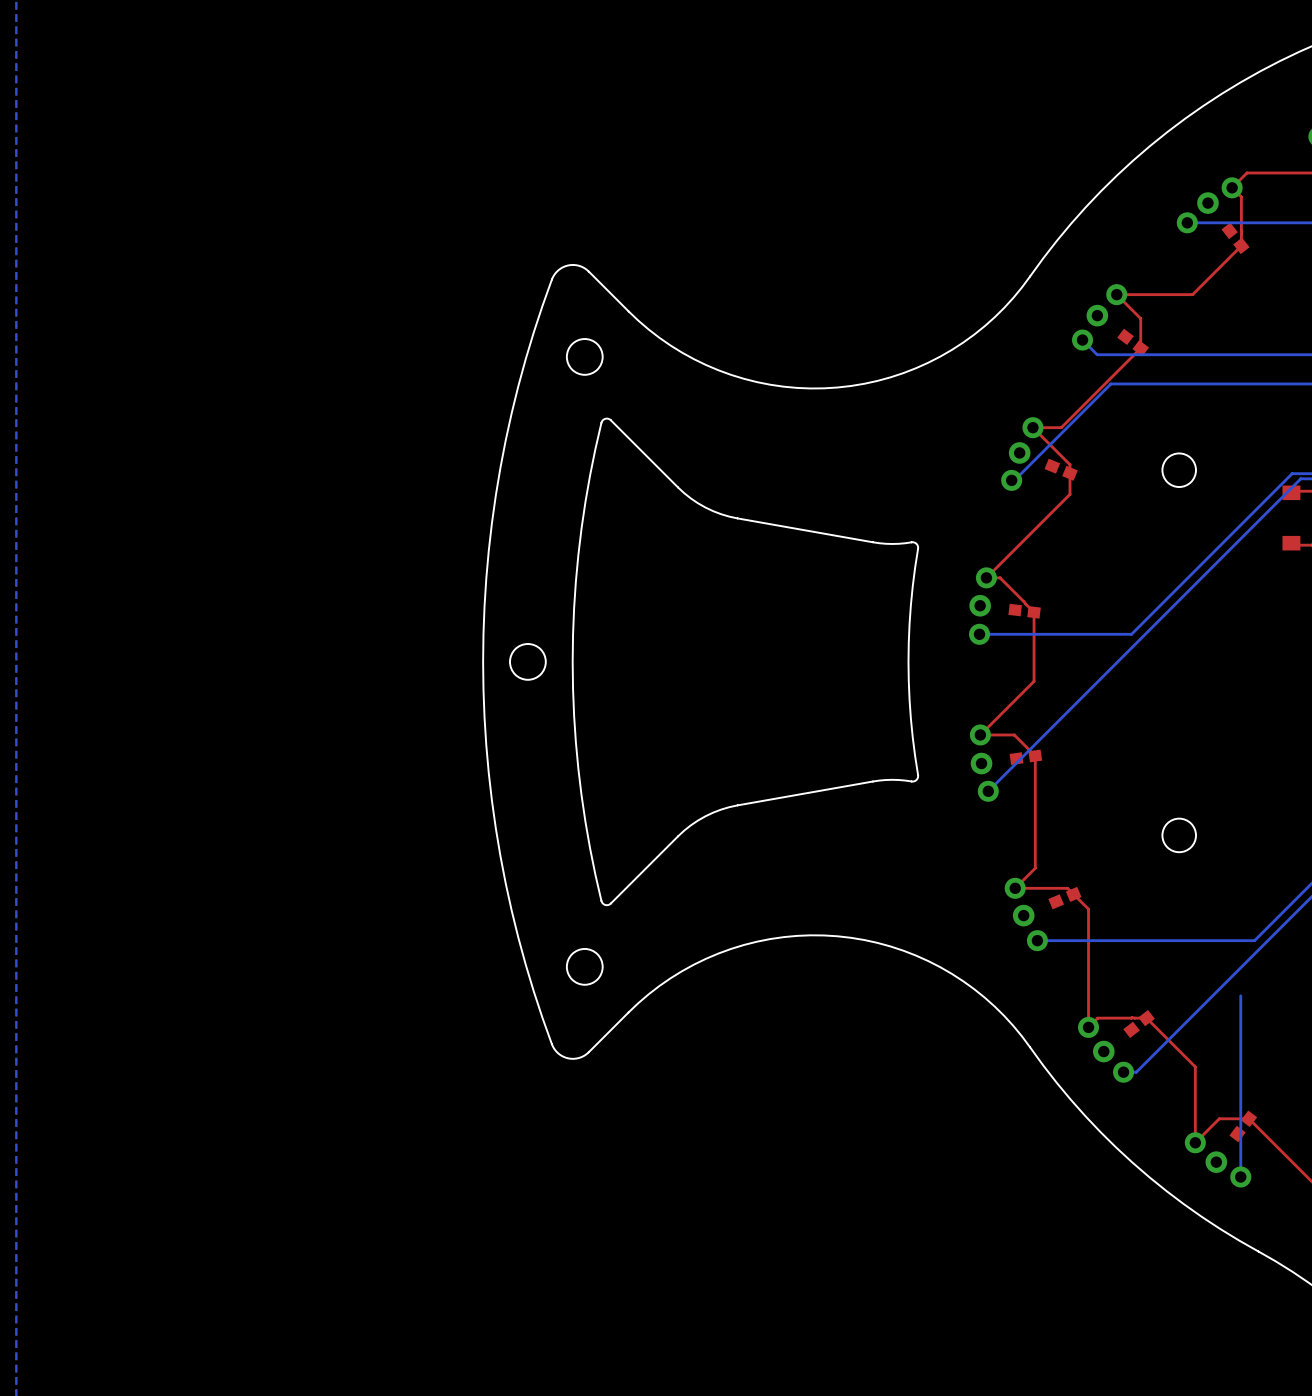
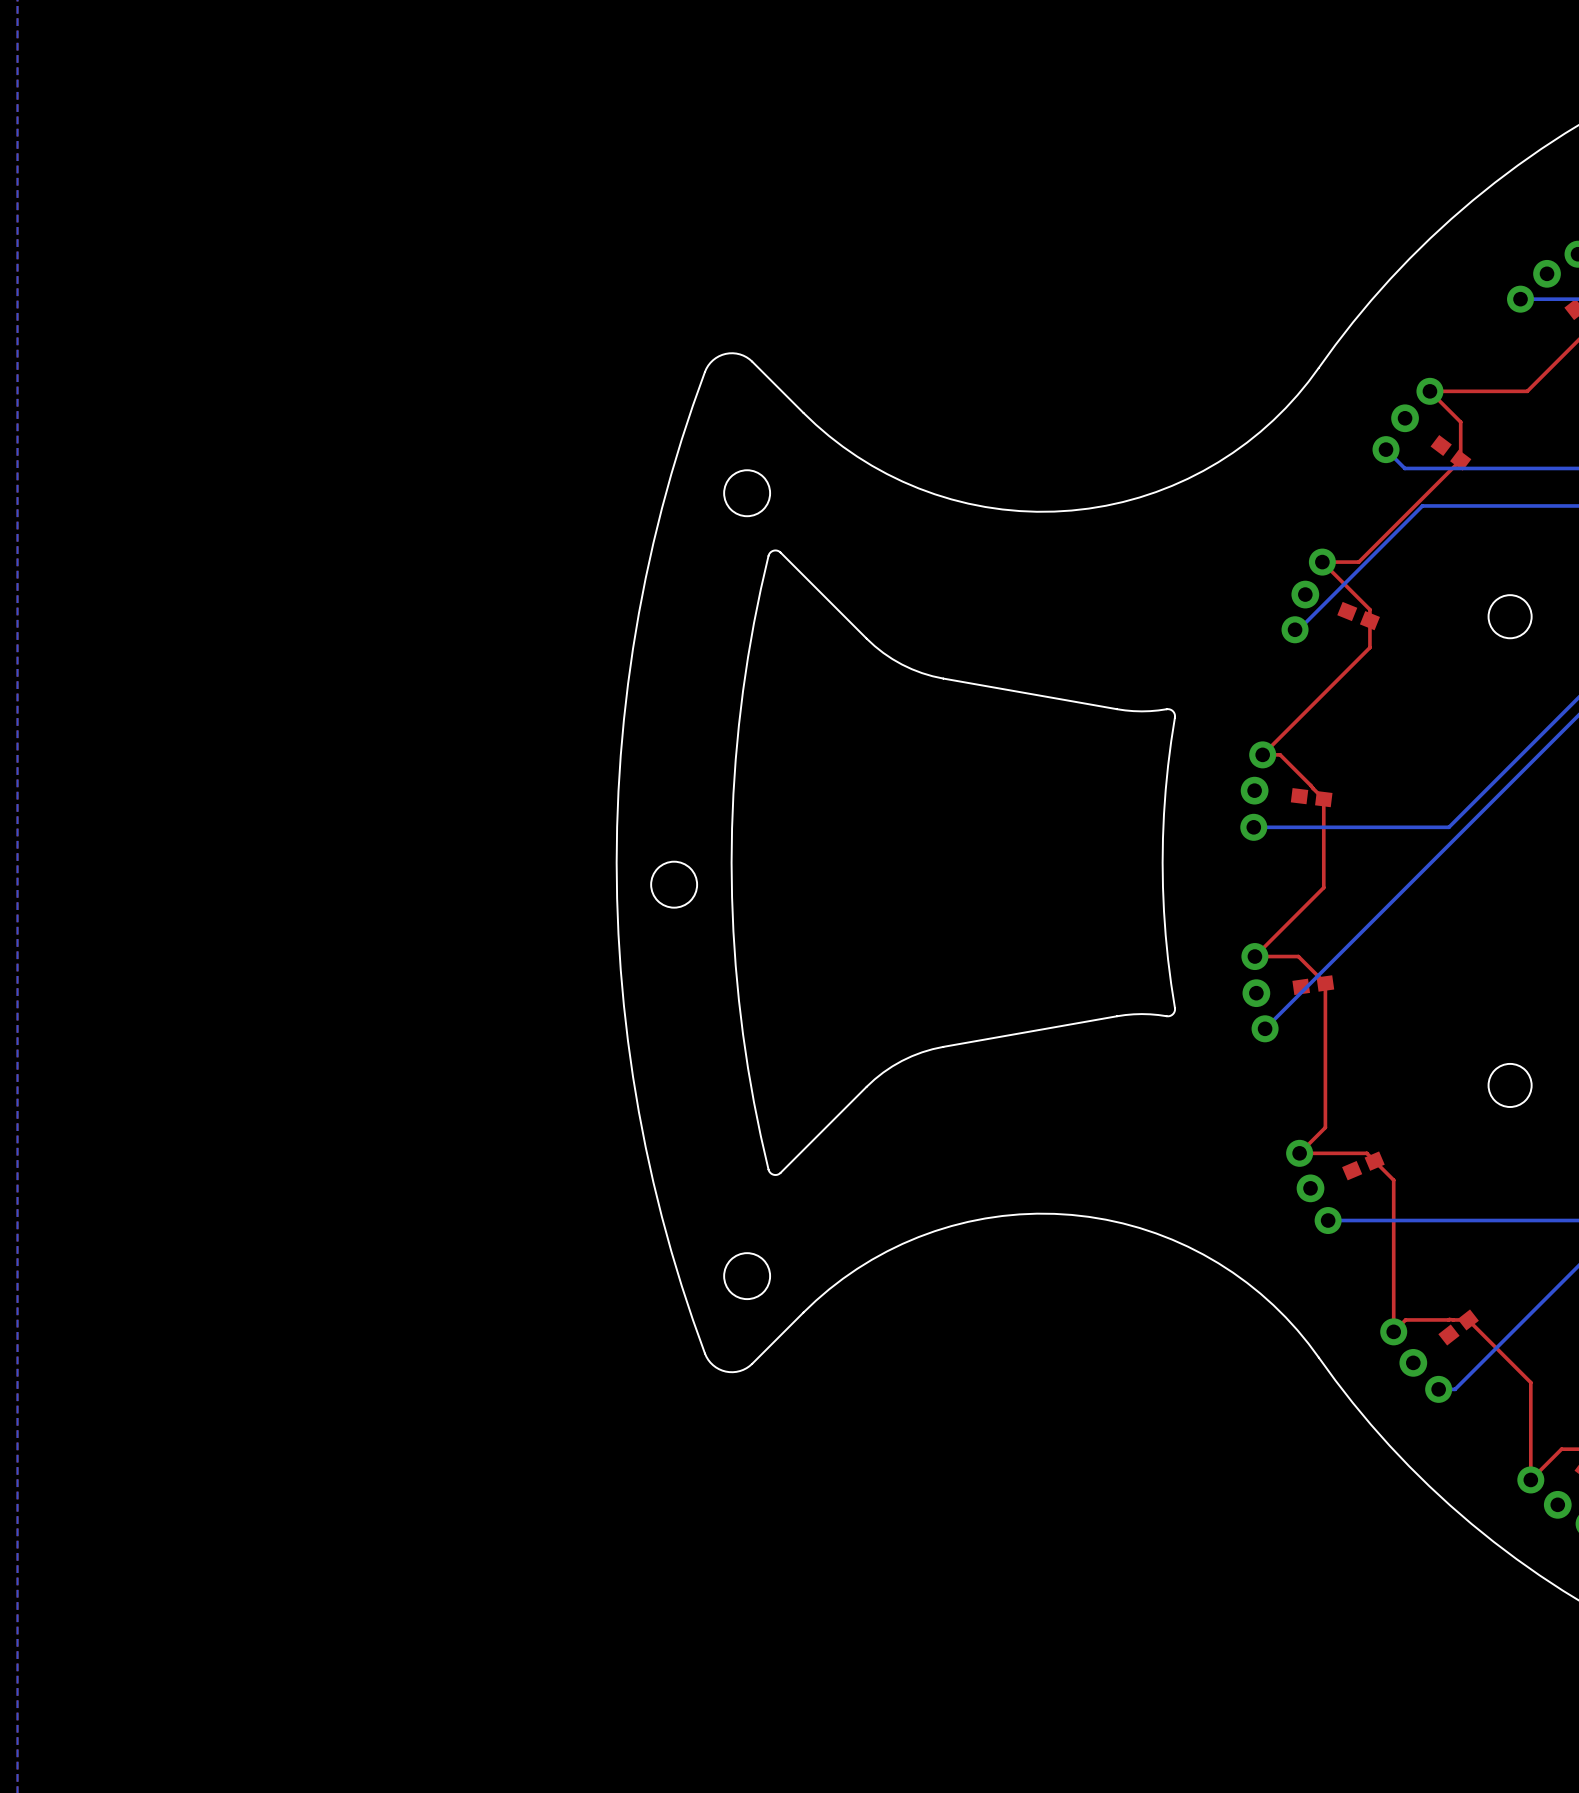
round board edge position: (584, 356) -> (747, 493)
round board edge position: (527, 661) -> (674, 884)
round board edge position: (584, 966) -> (747, 1276)

